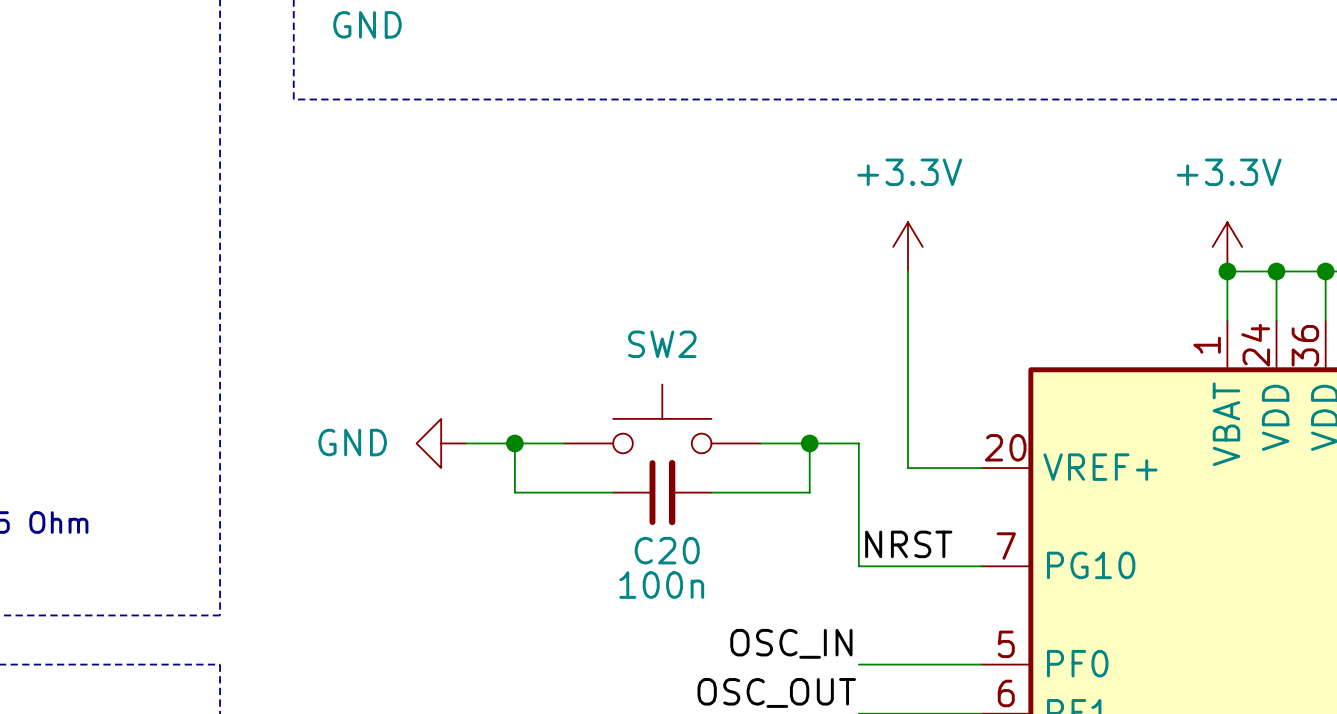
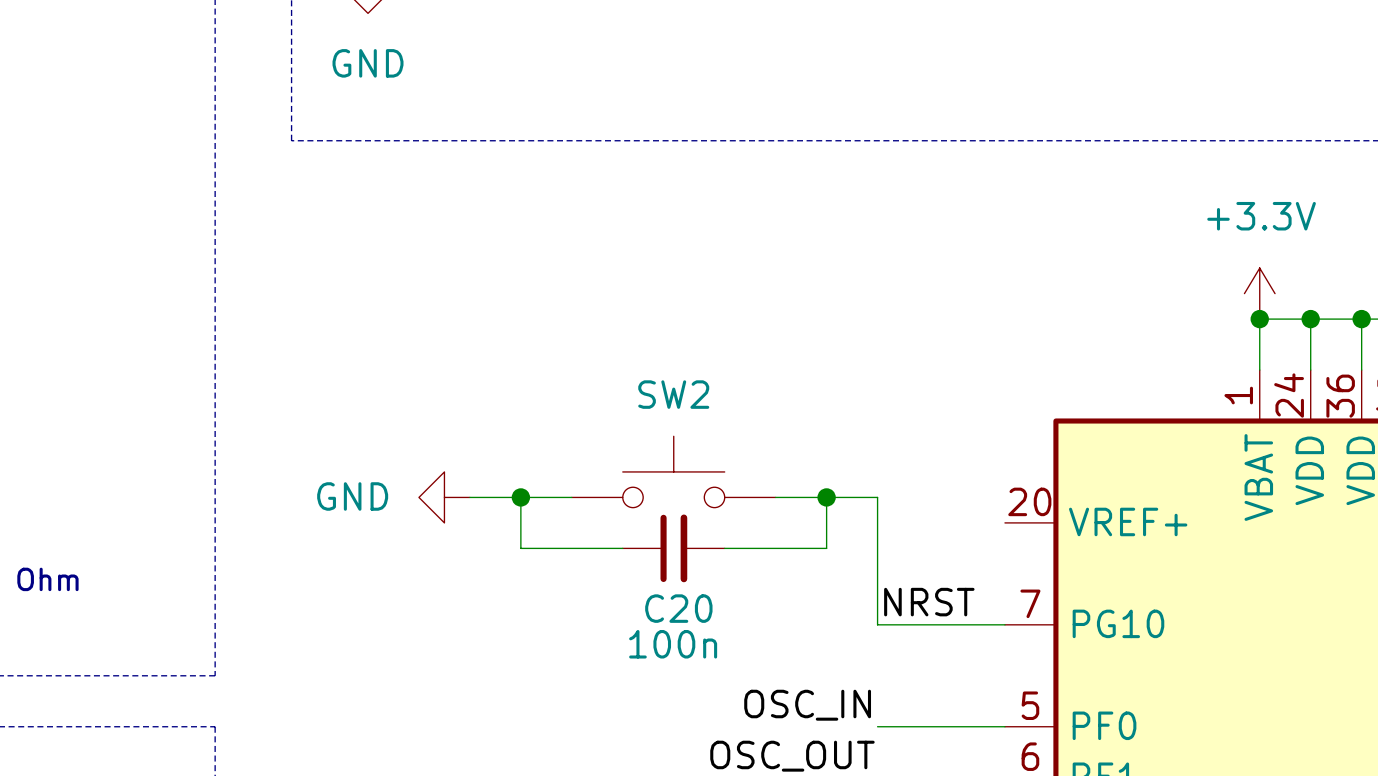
power symbol: +3.3V (907, 246) -> none
wire: (907, 271) (907, 468) (981, 468) -> none

